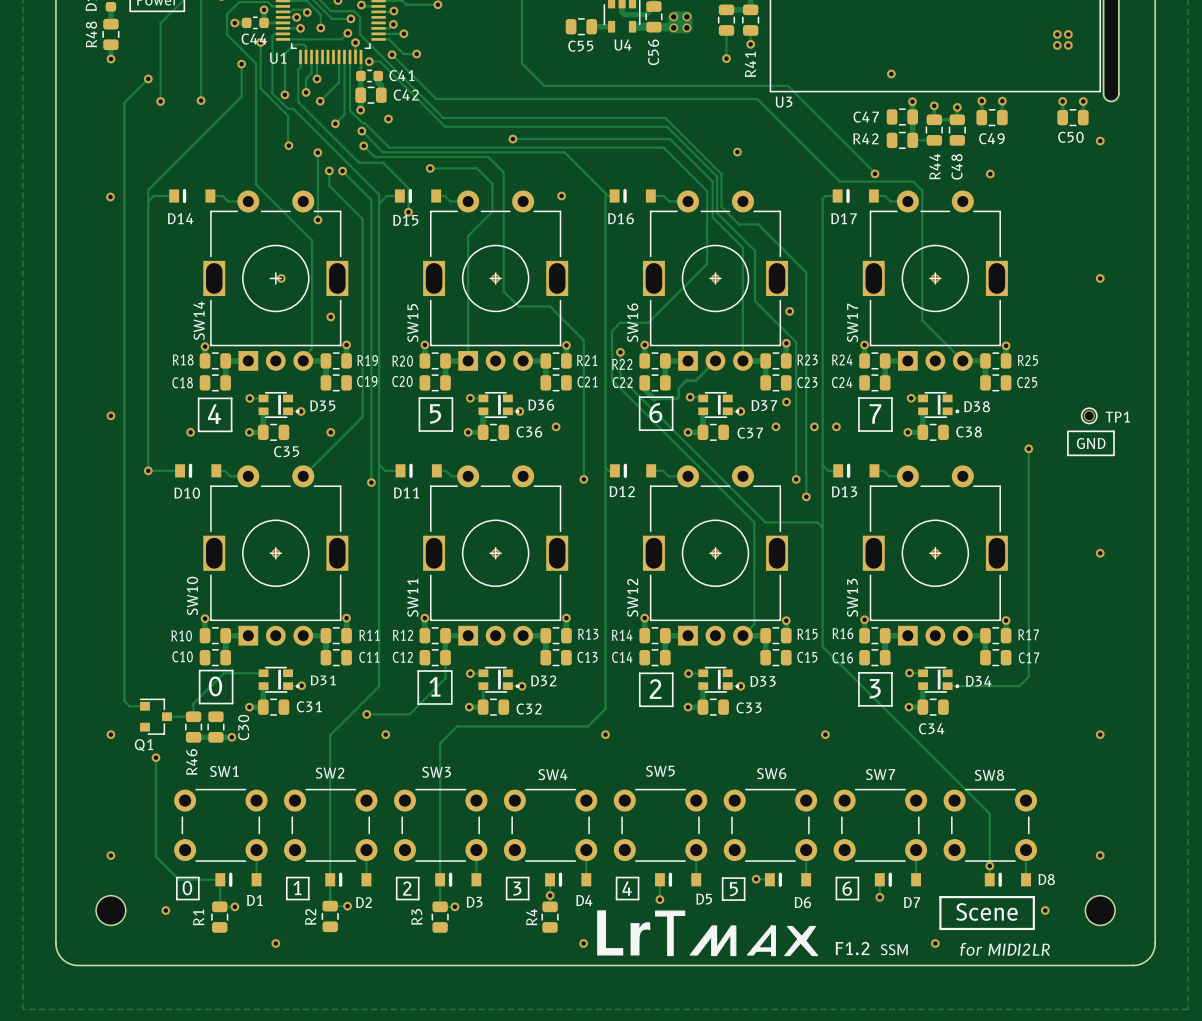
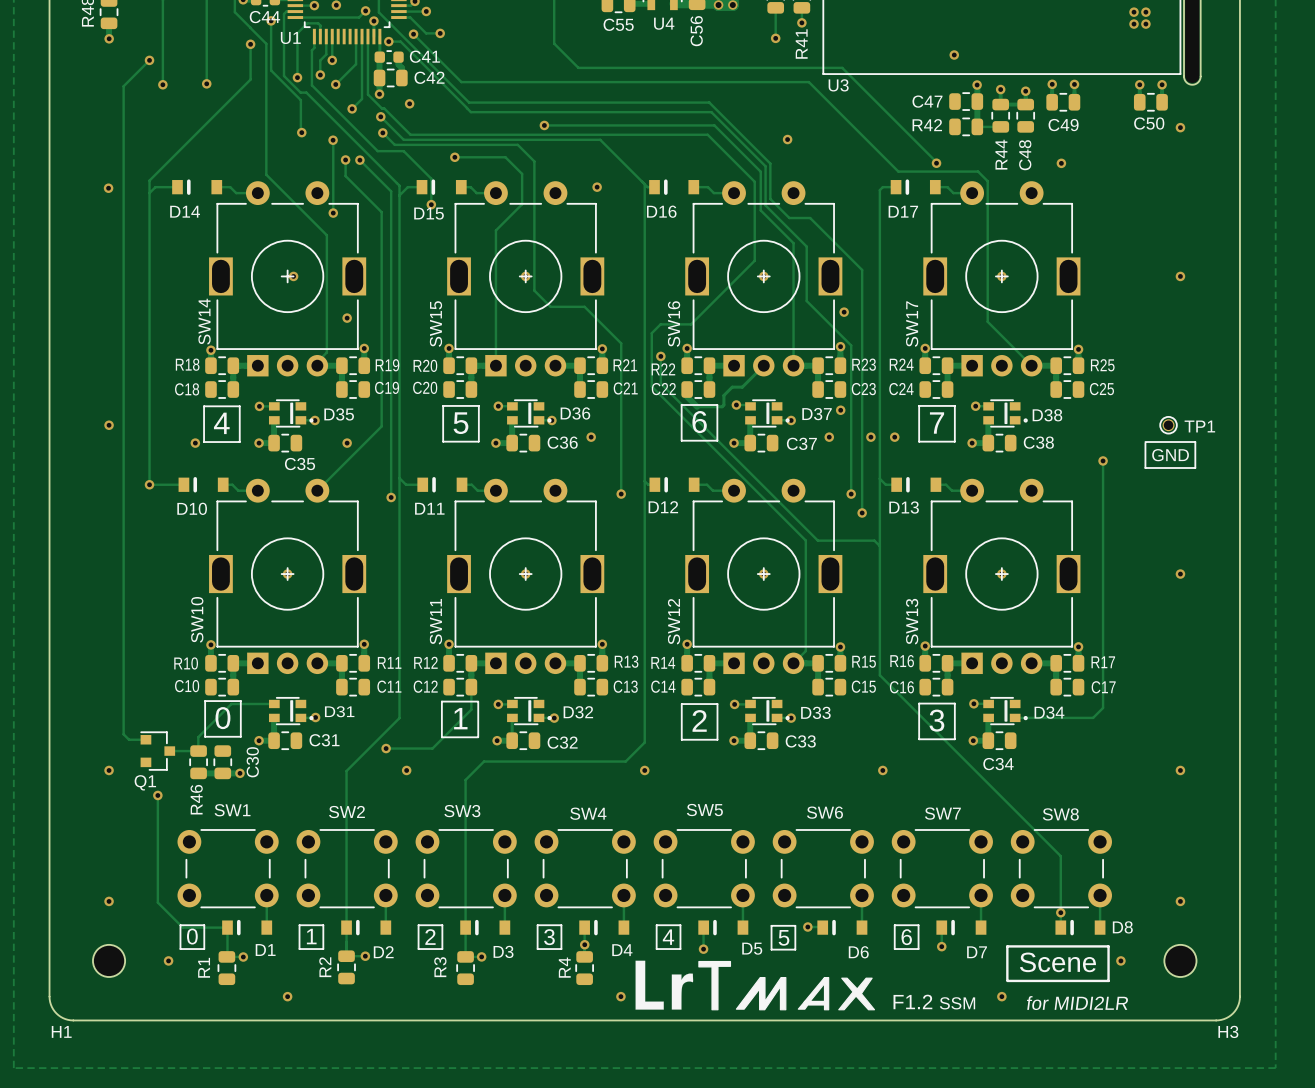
H1 name: none -> H1 (61, 1031)
H3 name: none -> H3 (1228, 1031)

